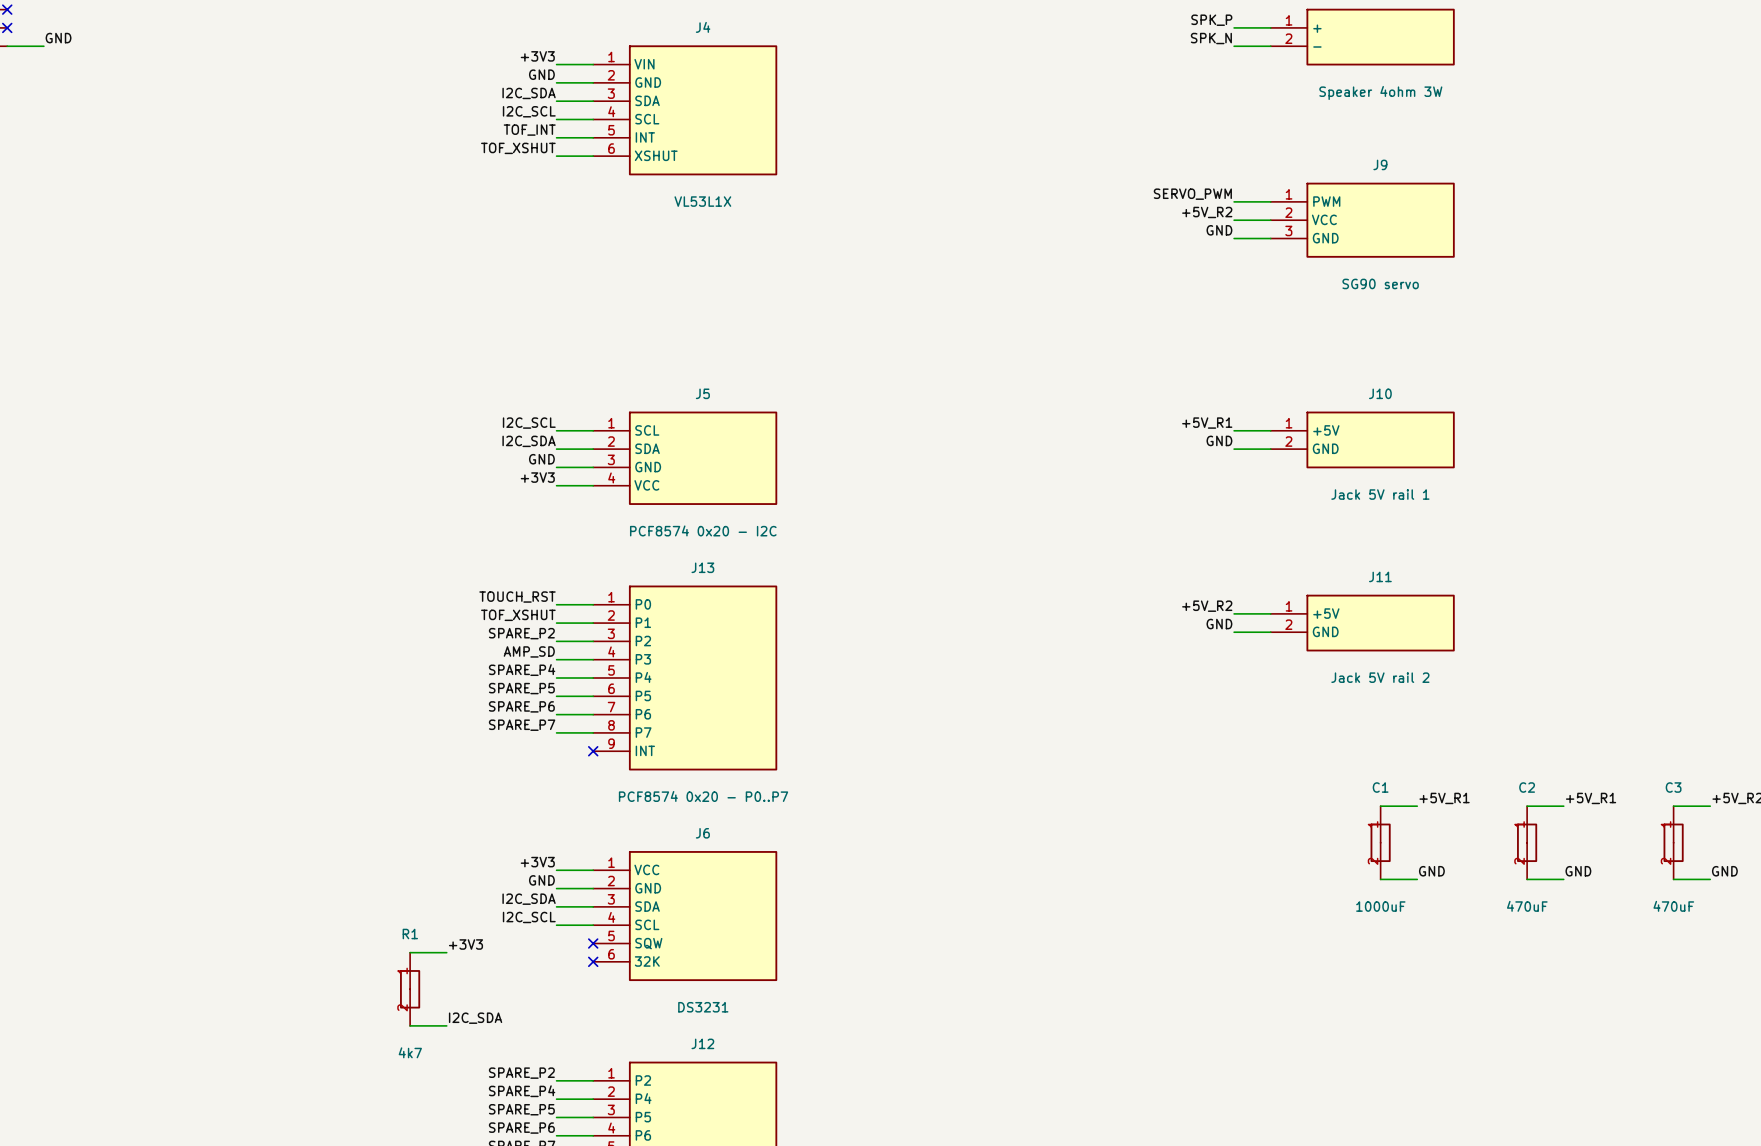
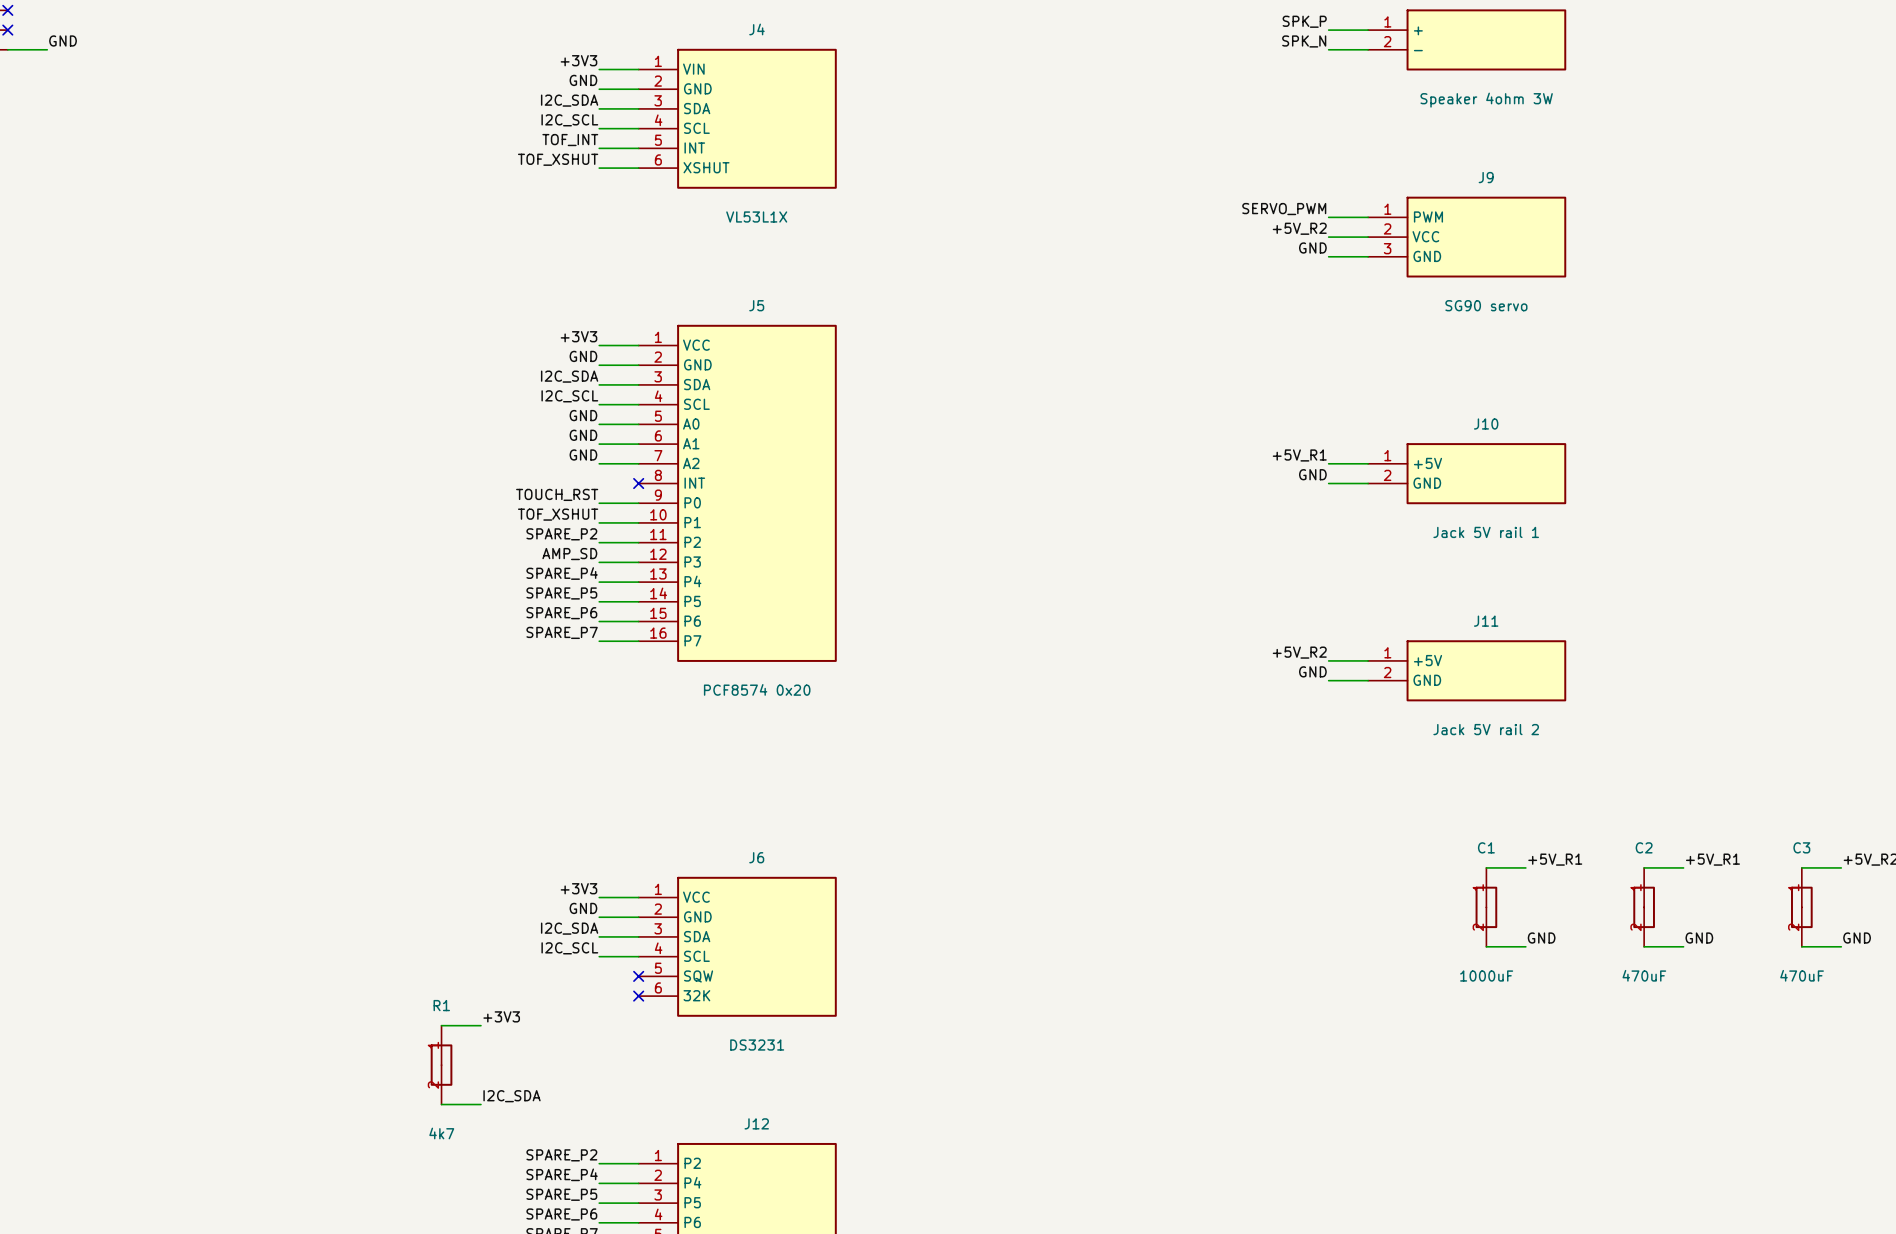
label: none -> +3V3 (578, 336)
wire: none -> (599, 345) (638, 345)
label: none -> GND (583, 356)
wire: none -> (599, 365) (638, 365)
wire: none -> (599, 384) (638, 384)
label: none -> I2C_SCL (569, 396)
label: none -> GND (583, 415)
J5 name position: J5 (702, 393) -> J5 (756, 305)
wire: none -> (599, 424) (638, 424)
label: none -> GND (583, 435)
J5 symbol: [593, 411, 778, 505] -> [638, 324, 837, 662]
wire: none -> (599, 444) (638, 444)
label: I2C_SCL (529, 423) -> GND (583, 455)
label position: I2C_SDA (529, 441) -> I2C_SDA (569, 376)
wire: (556, 449) (593, 449) -> (599, 404) (638, 404)
no-connect mark: none -> (638, 483)
label: GND (541, 459) -> TOUCH_RST (557, 494)
label: +3V3 (537, 477) -> TOF_XSHUT (558, 514)
J5 value: PCF8574 0x20 - I2C (703, 530) -> PCF8574 0x20 (757, 689)
label: TOUCH_RST (517, 597) -> none
wire: (556, 604) (593, 604) -> (599, 542) (638, 542)
label: TOF_XSHUT (518, 615) -> none
wire: (556, 623) (593, 623) -> (599, 562) (638, 562)
label position: SPARE_P2 (521, 633) -> SPARE_P2 (561, 534)
wire: (556, 641) (593, 641) -> (599, 582) (638, 582)
label position: AMP_SD (529, 651) -> AMP_SD (569, 554)
wire: (556, 659) (593, 659) -> (599, 601) (638, 601)
label position: SPARE_P4 (522, 670) -> SPARE_P4 (562, 573)
wire: (556, 678) (593, 678) -> (599, 621) (638, 621)
J13: PCF8574 0x20 - P0..P7 (685, 678) -> none
label position: SPARE_P5 (521, 688) -> SPARE_P5 (561, 593)
wire: (556, 696) (593, 696) -> (599, 641) (638, 641)
label position: SPARE_P6 (521, 706) -> SPARE_P6 (561, 613)
wire: (556, 714) (593, 714) -> none
label position: SPARE_P7 (522, 725) -> SPARE_P7 (562, 632)
wire: (556, 732) (593, 732) -> none
no-connect mark: (593, 751) -> none
label: none -> +3V3 (578, 888)
label: none -> GND (583, 908)
label: +3V3 (537, 862) -> I2C_SDA (569, 928)
label: GND (541, 880) -> I2C_SCL (569, 948)
label: I2C_SDA (529, 899) -> none
wire: (556, 906) (593, 906) -> (599, 897) (638, 897)
no-connect mark: none -> (638, 976)
J6 position: (685, 916) -> (737, 946)
label: I2C_SCL (529, 917) -> none
wire: (556, 925) (593, 925) -> (599, 917) (638, 917)
no-connect mark: none -> (638, 996)
no-connect mark: (593, 943) -> none
no-connect mark: (593, 961) -> none

